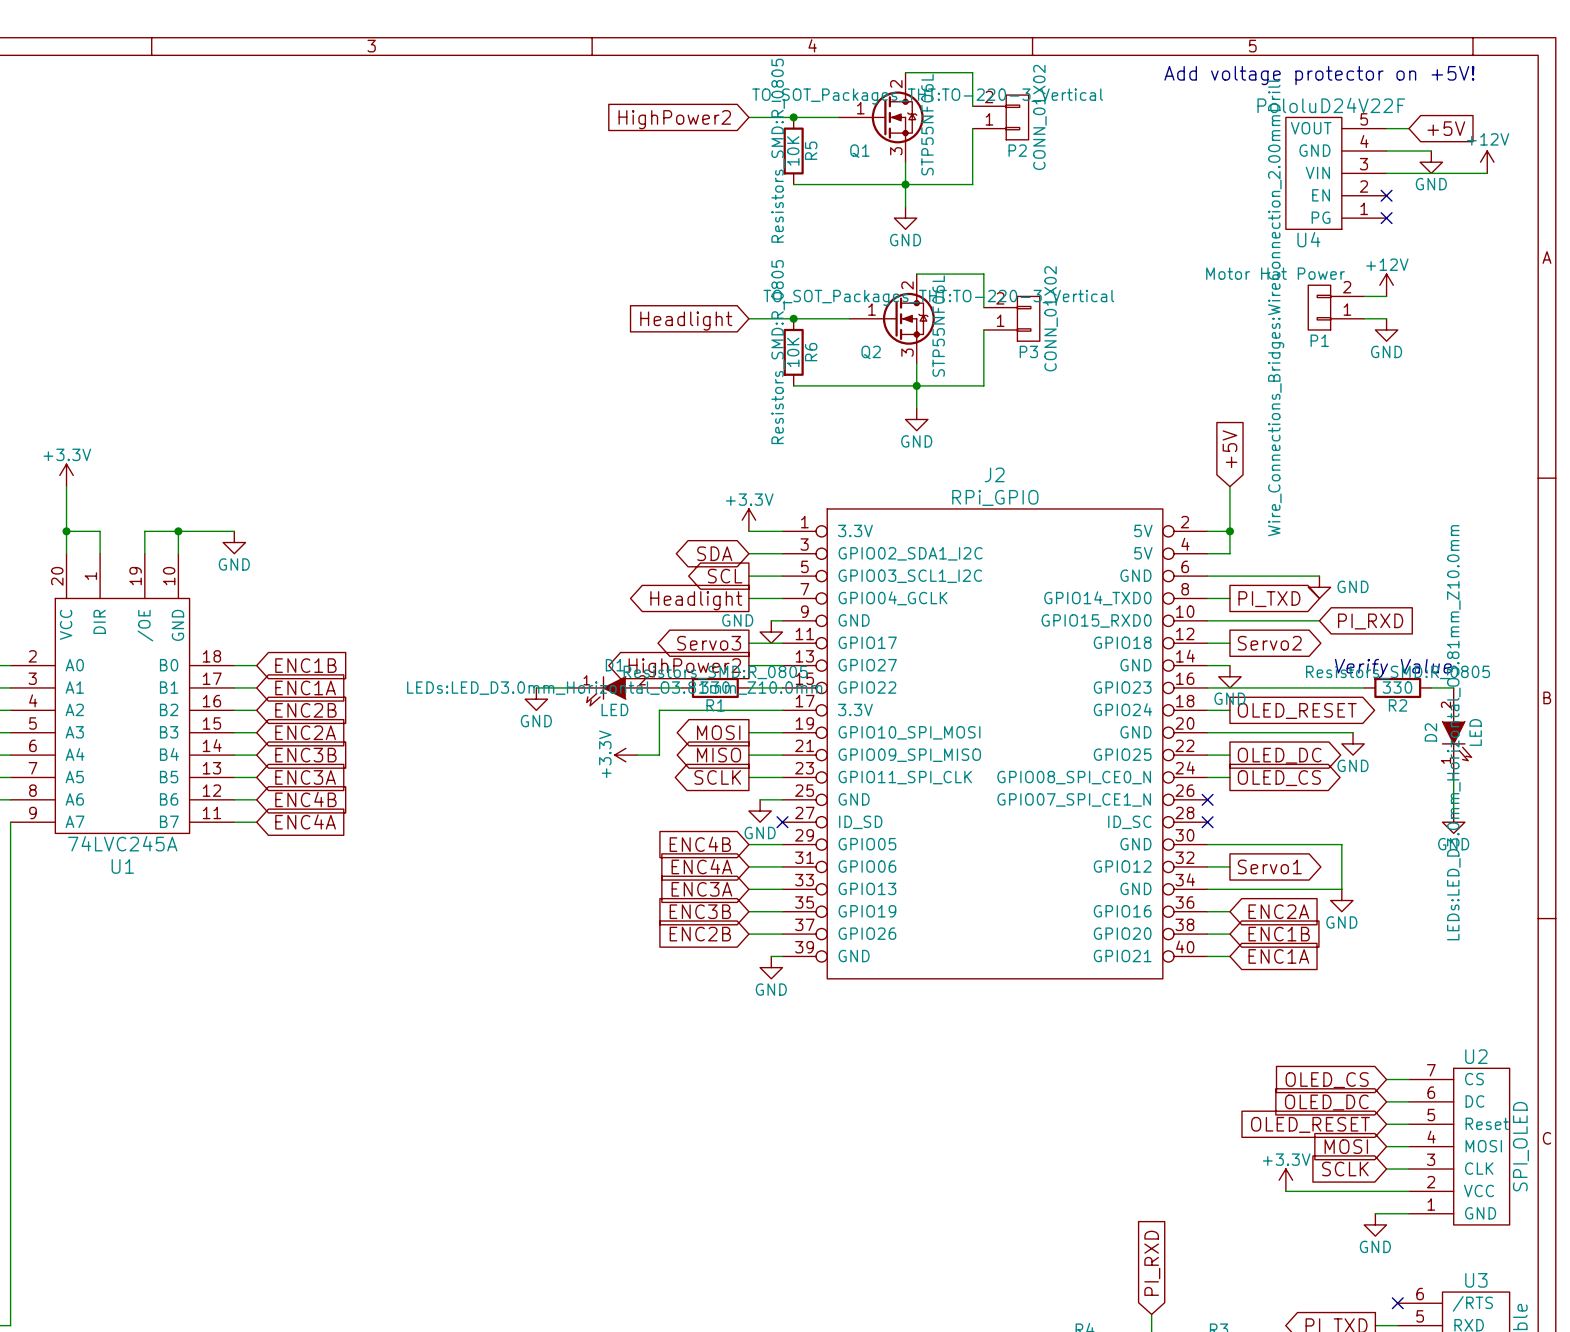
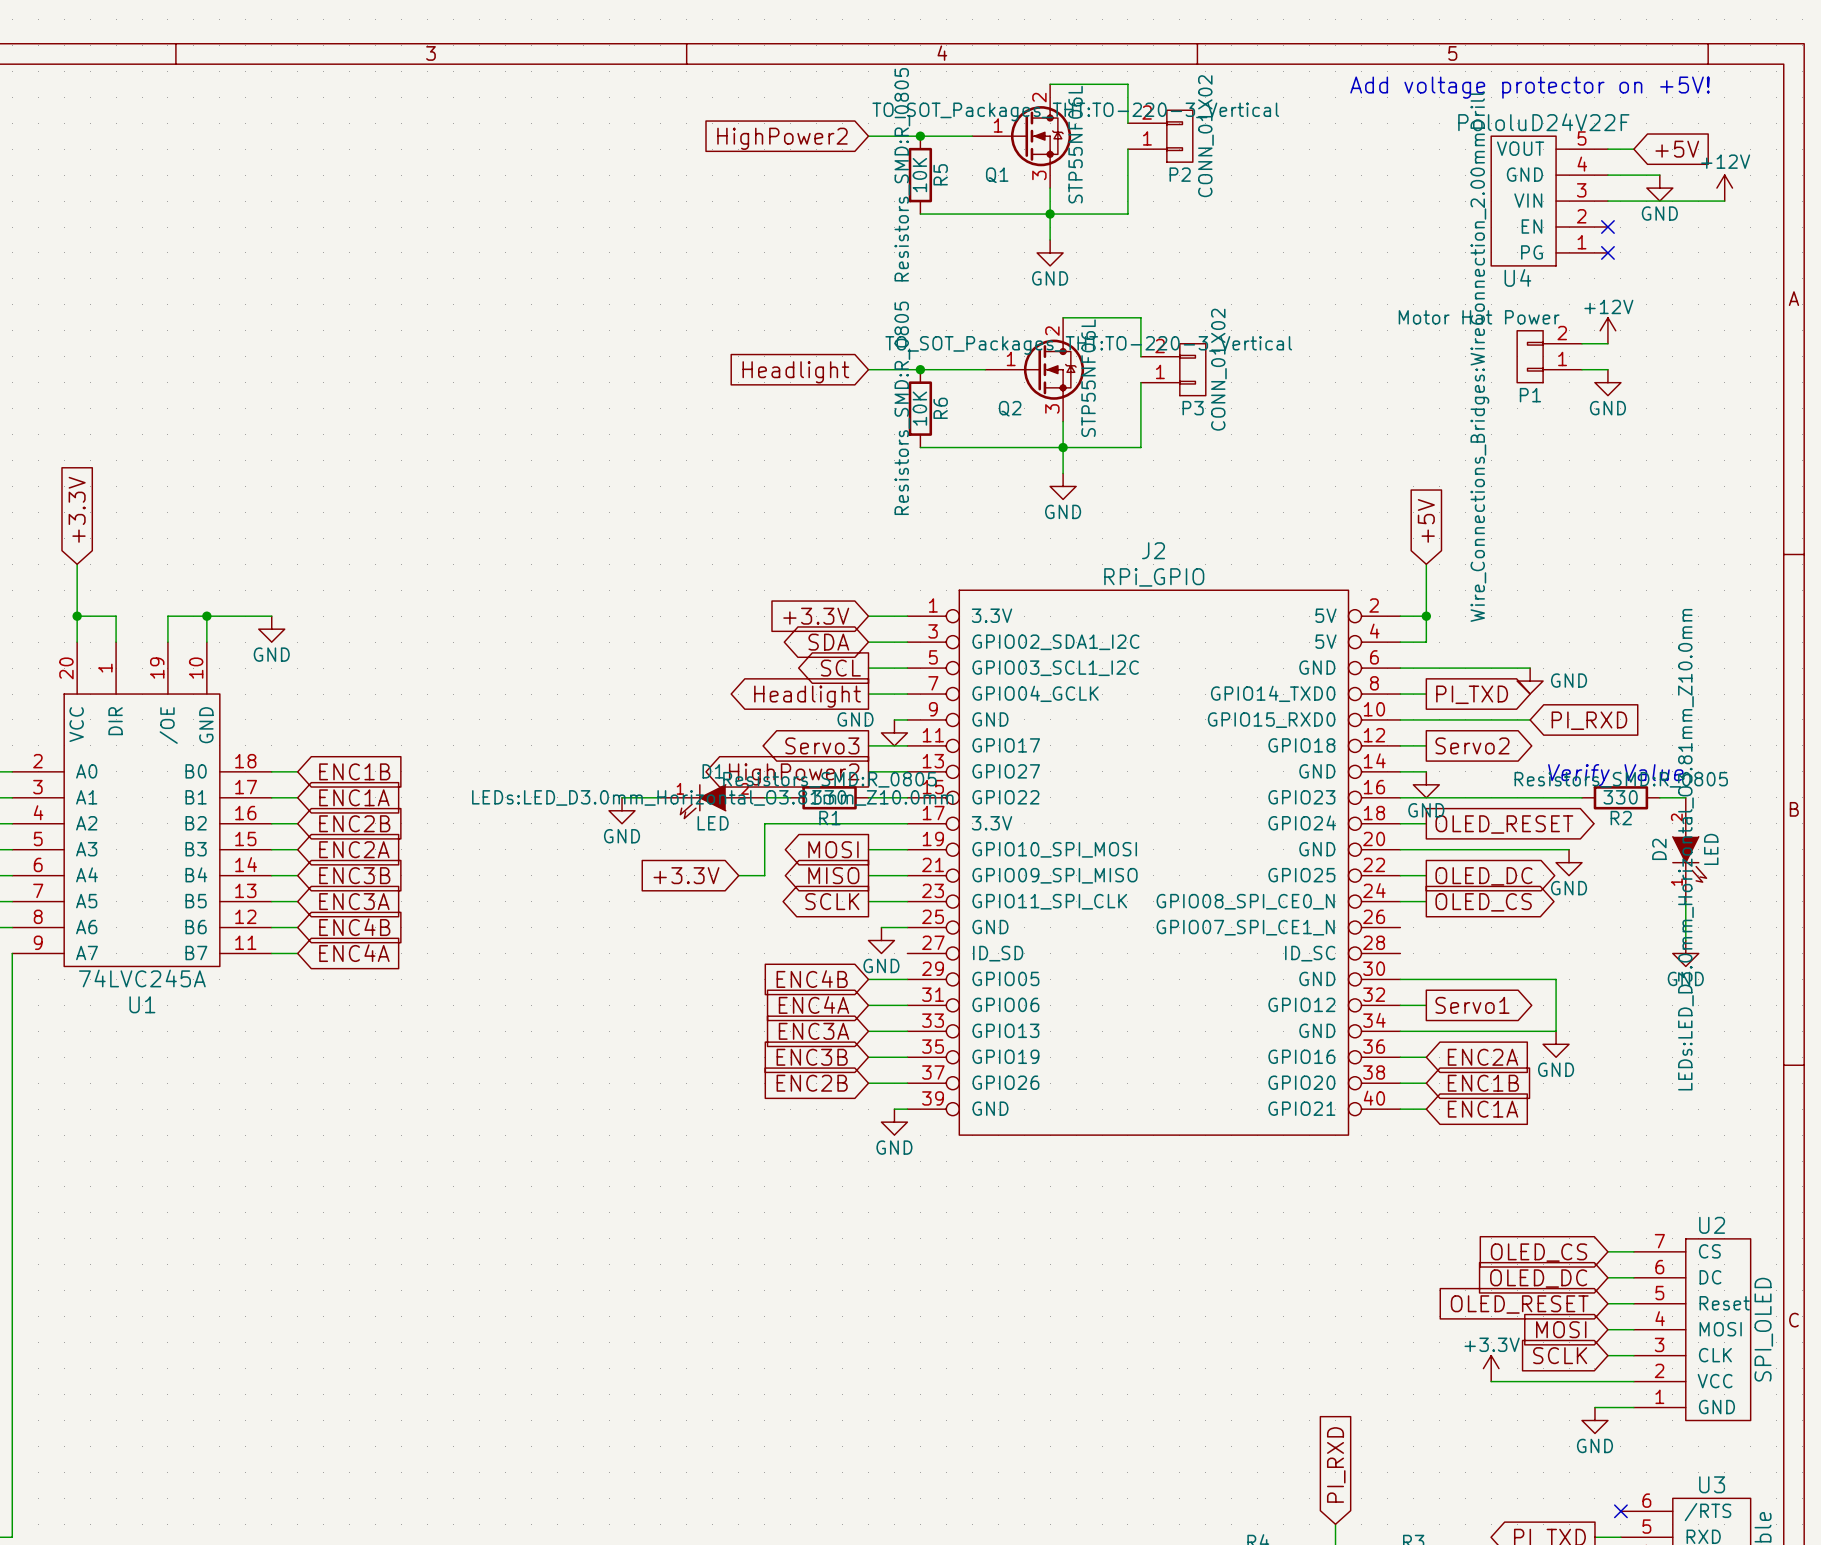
global label: none -> +3.3V (77, 509)
power symbol: +3.3V (66, 475) -> none
power symbol: +3.3V (748, 520) -> none
global label: none -> +3.3V (816, 616)
global label: none -> +3.3V (686, 875)
power symbol: +3.3V (625, 755) -> none
no-connect mark: (1207, 799) -> none
no-connect mark: (782, 822) -> none
no-connect mark: (1207, 822) -> none

